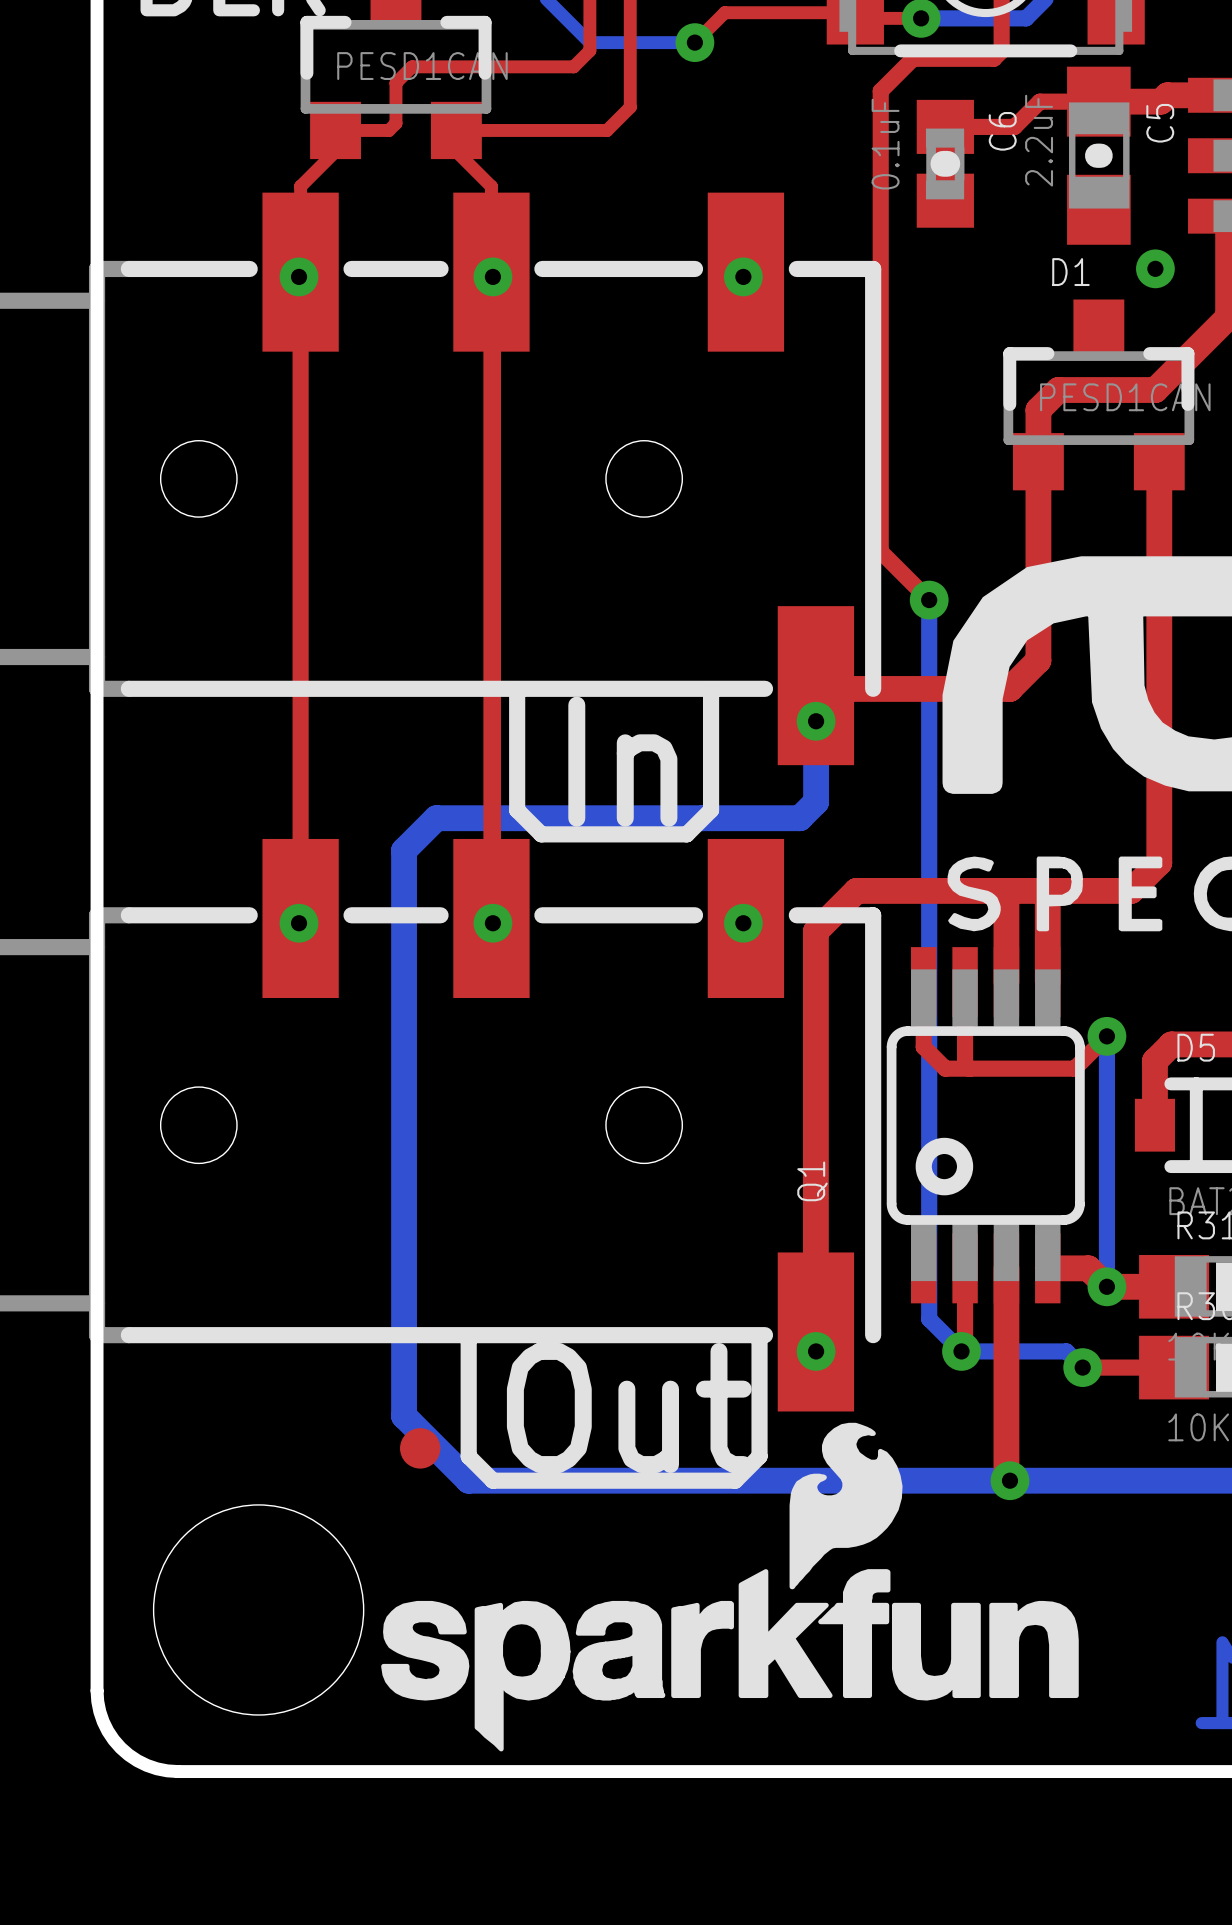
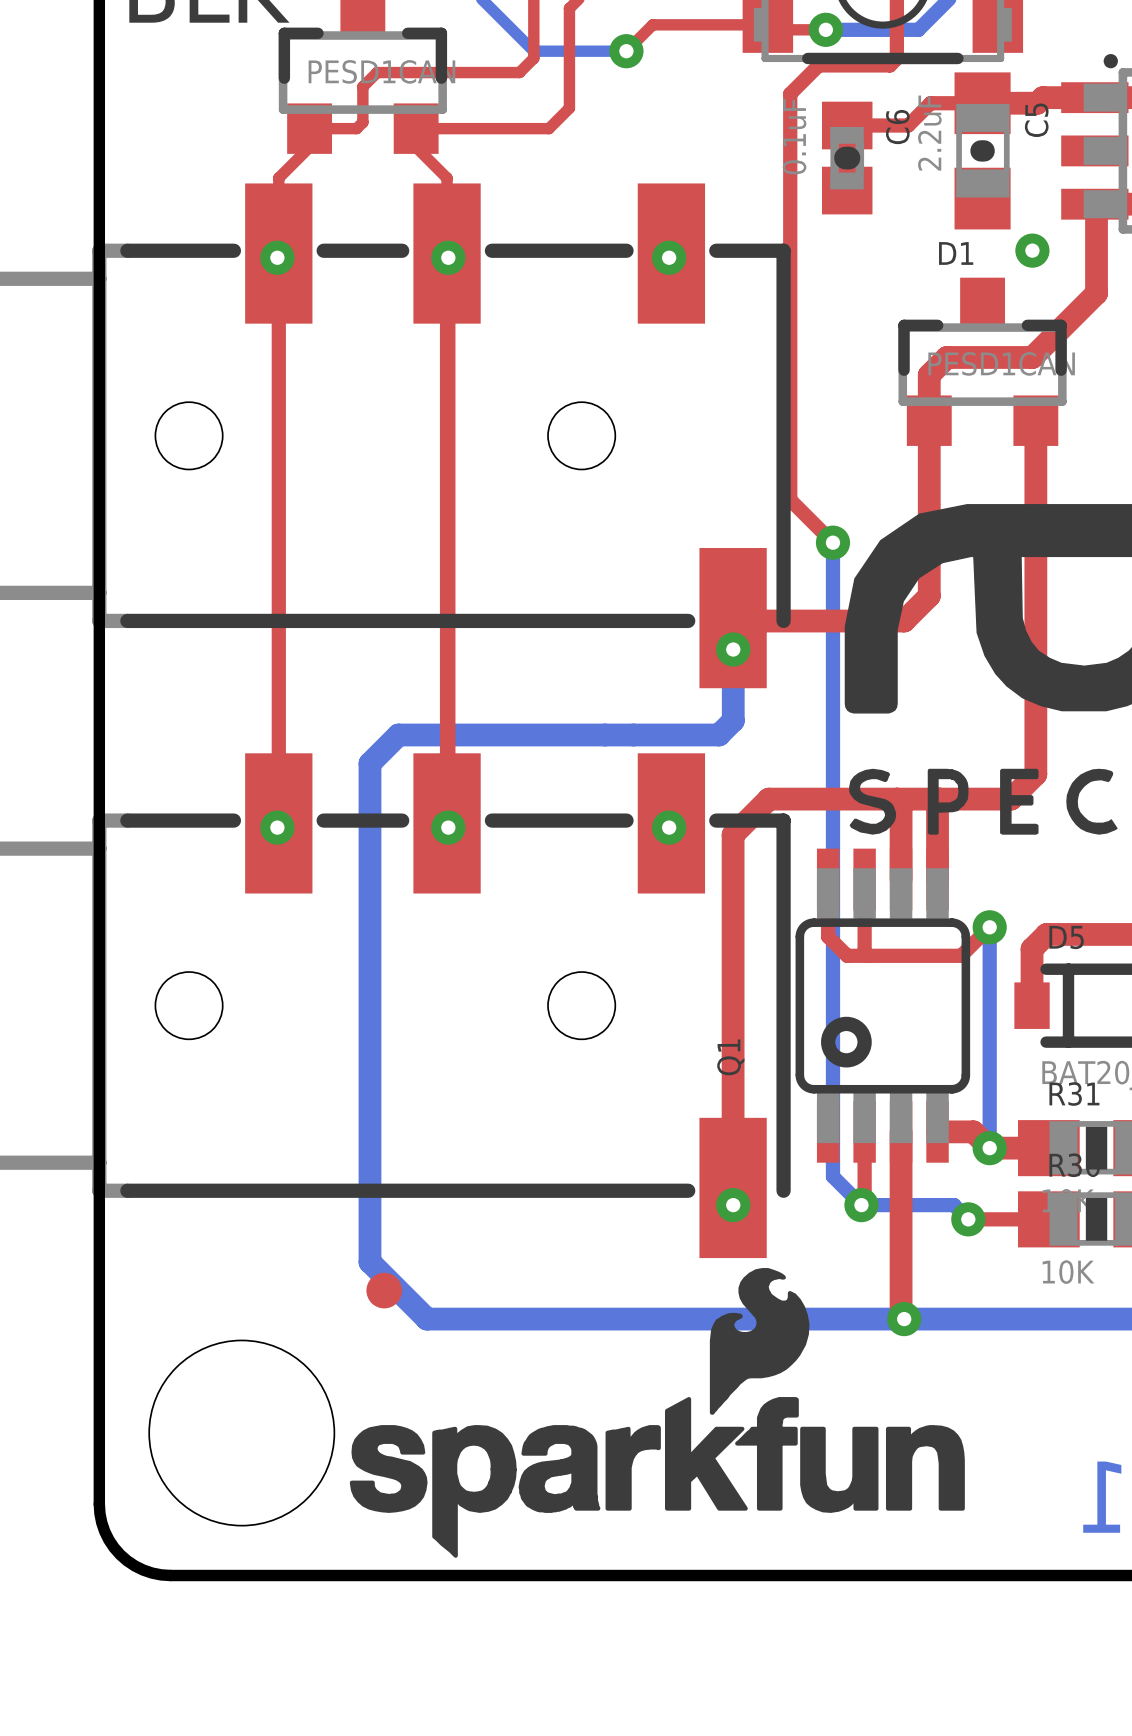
line: (517, 688) (517, 810) (541, 834) (686, 834) (711, 810) (711, 688) -> none
text: In (622, 761) -> none
line: (468, 1343) (468, 1456) (492, 1480) (735, 1480) (759, 1456) (759, 1343) -> none
text: Out (629, 1407) -> none

